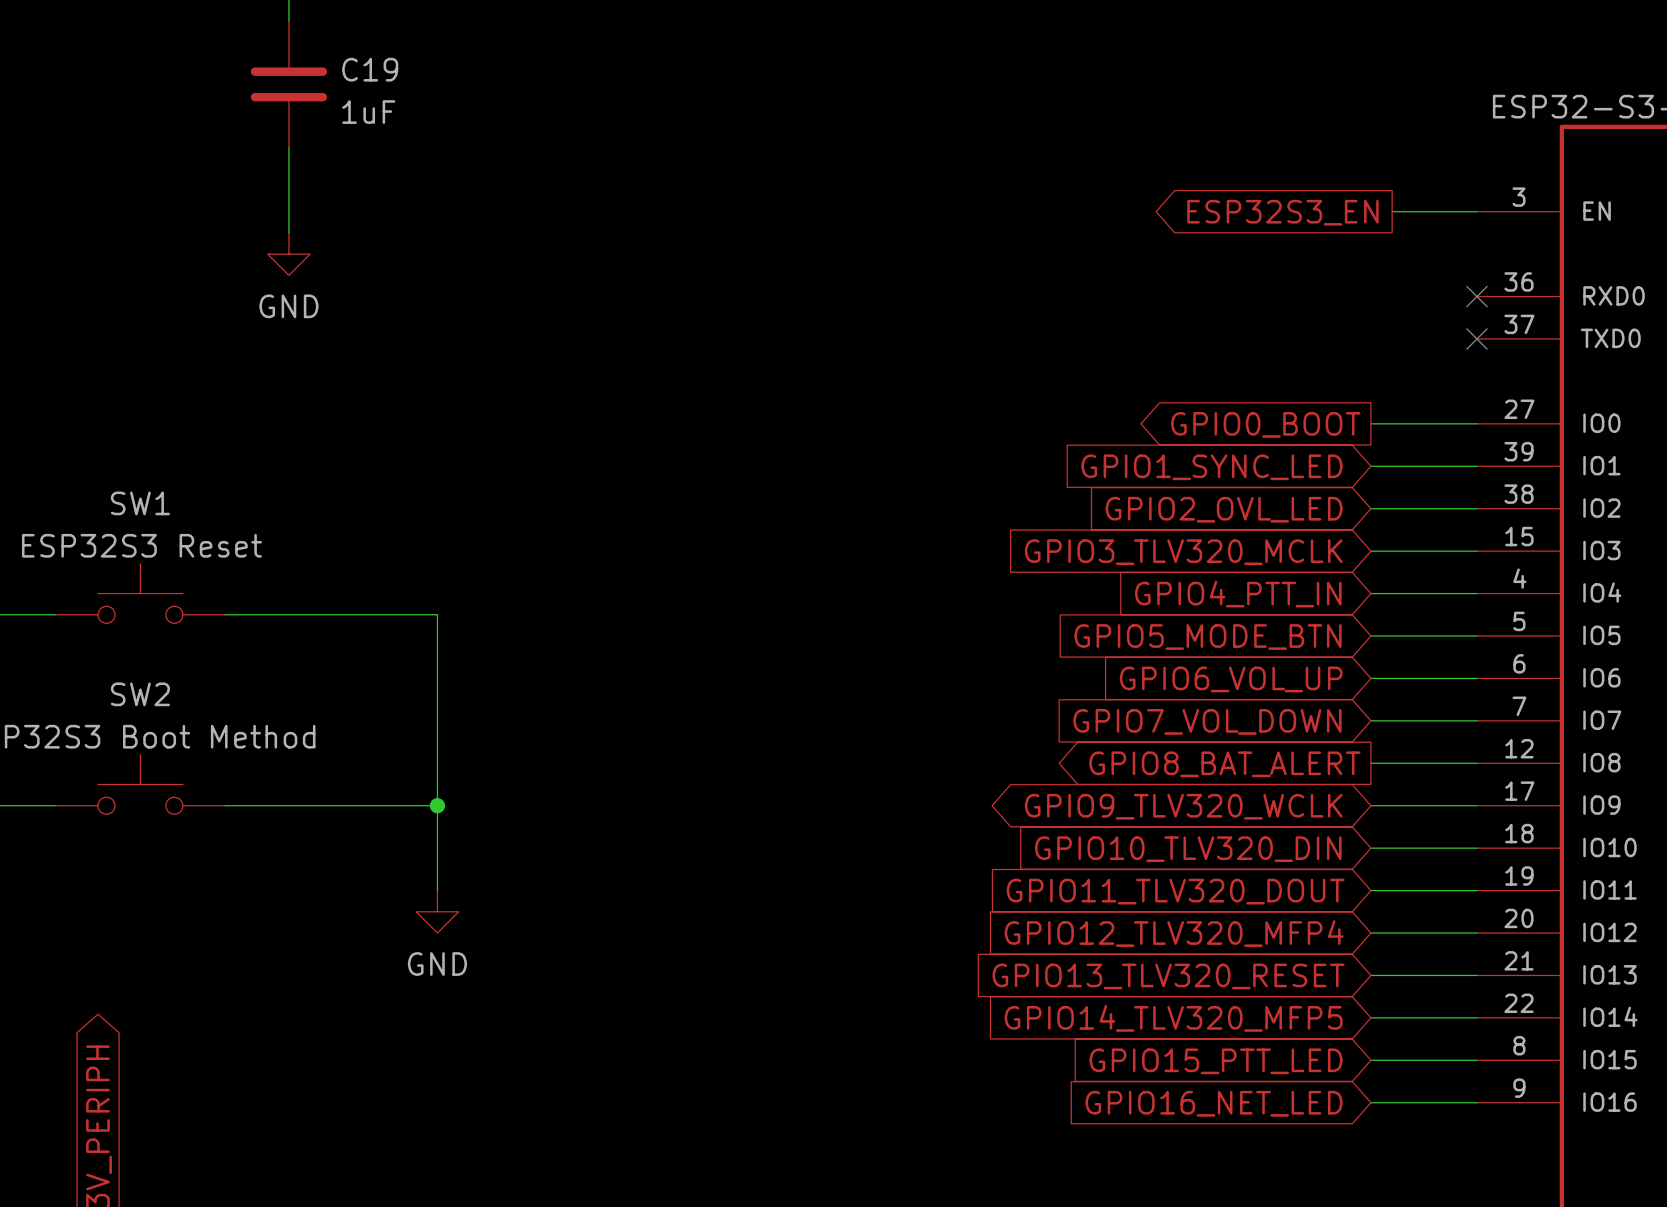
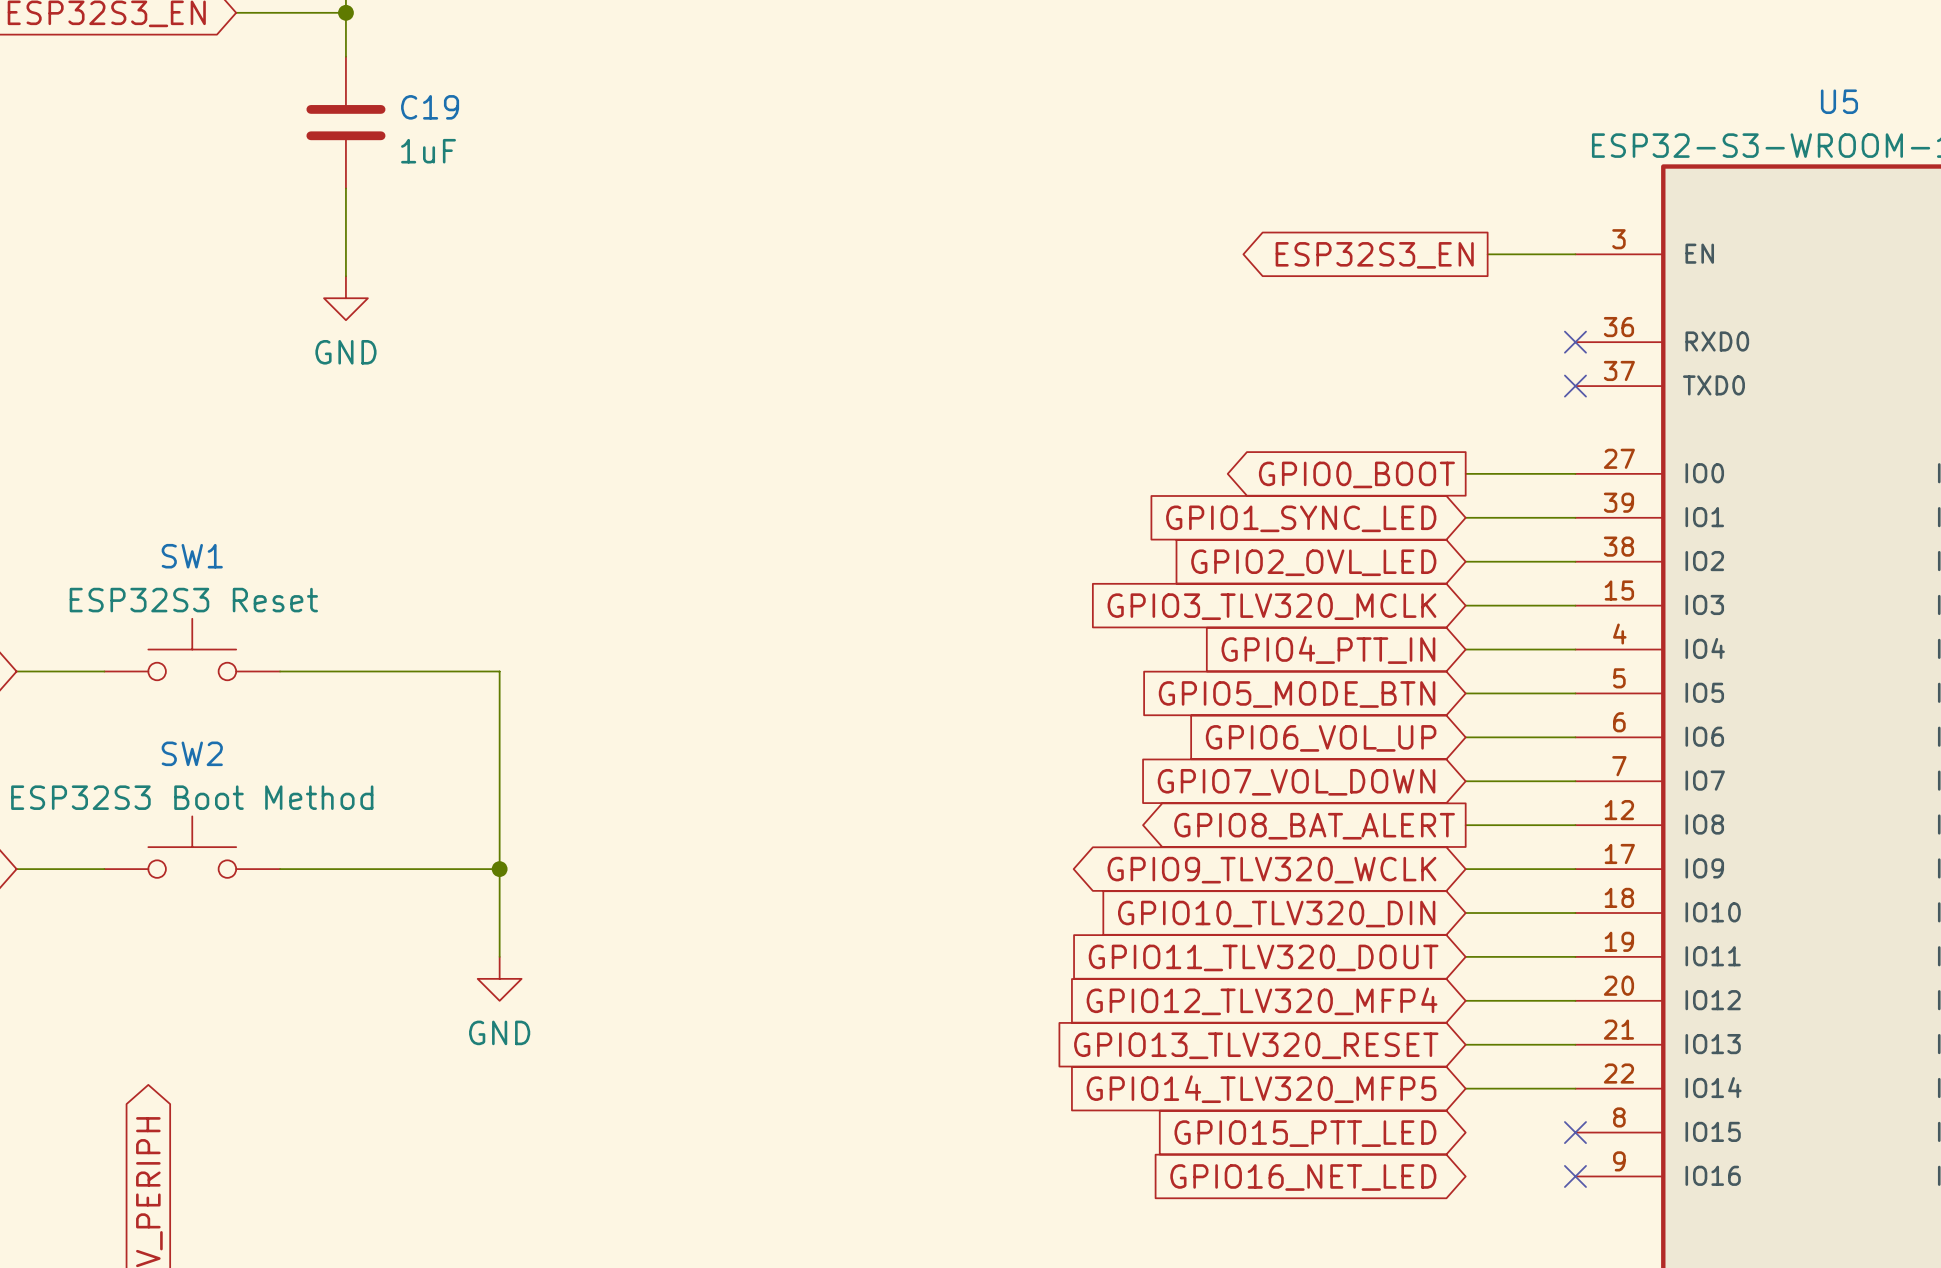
wire: (1370, 1060) (1476, 1060) -> none
no-connect mark: none -> (1575, 1132)
wire: (1370, 1102) (1476, 1102) -> none
no-connect mark: none -> (1575, 1176)

